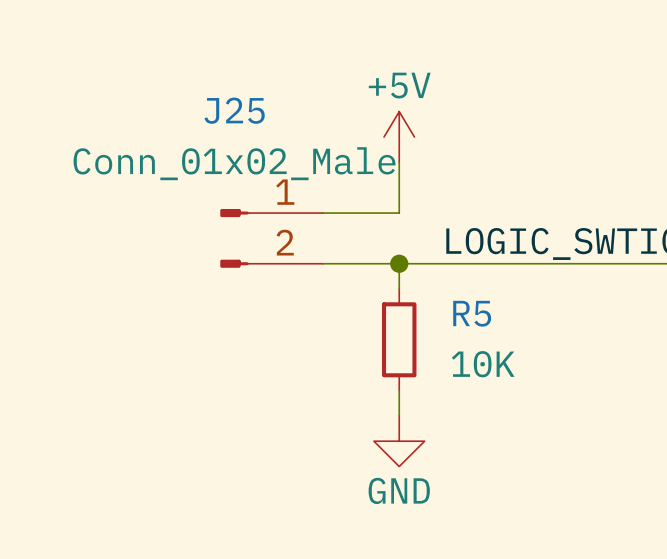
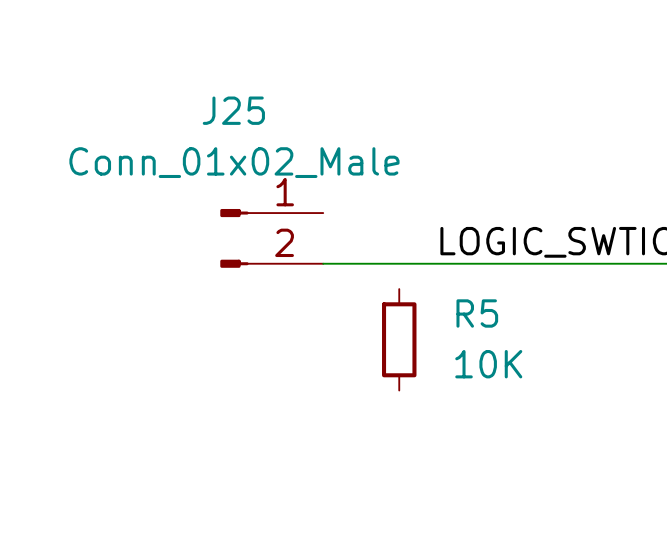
power symbol: +5V (399, 136) -> none
wire: (399, 162) (399, 213) (323, 213) -> none
wire: (399, 263) (399, 289) -> none
junction: (399, 263) -> none
wire: (399, 390) (399, 415) -> none
power symbol: GND (399, 441) -> none

